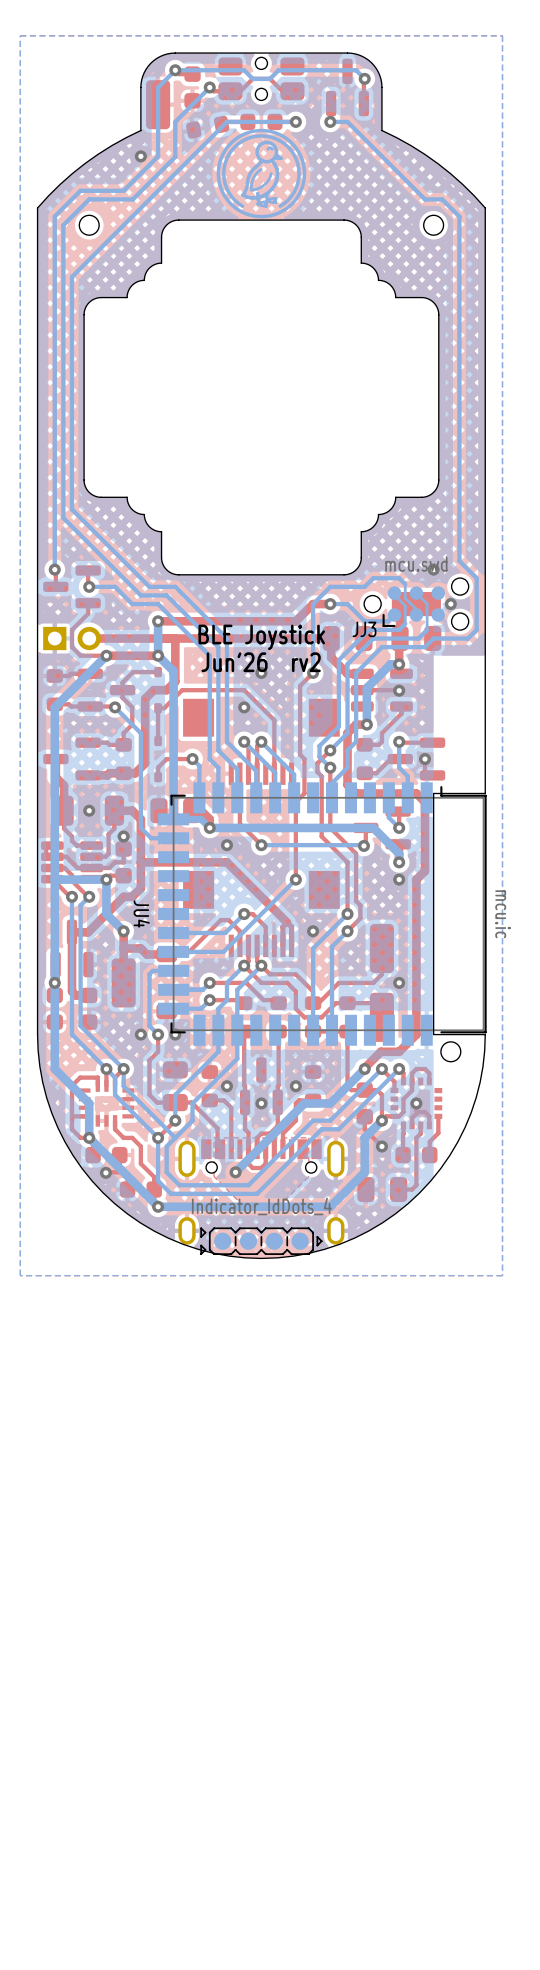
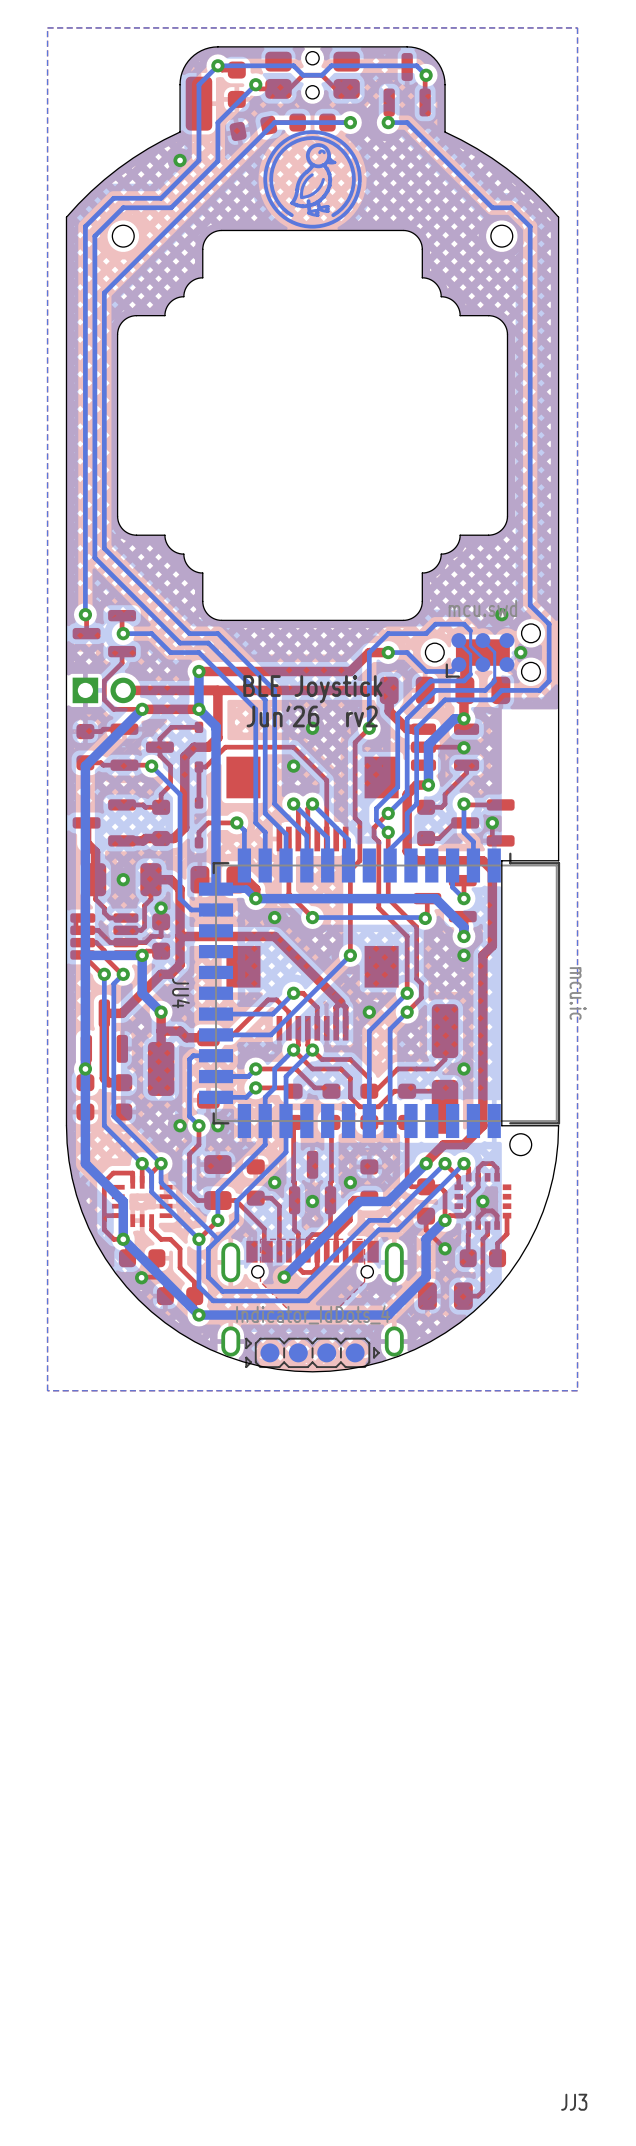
JJ3 name position: JJ3 (364, 629) -> JJ3 (574, 2102)

